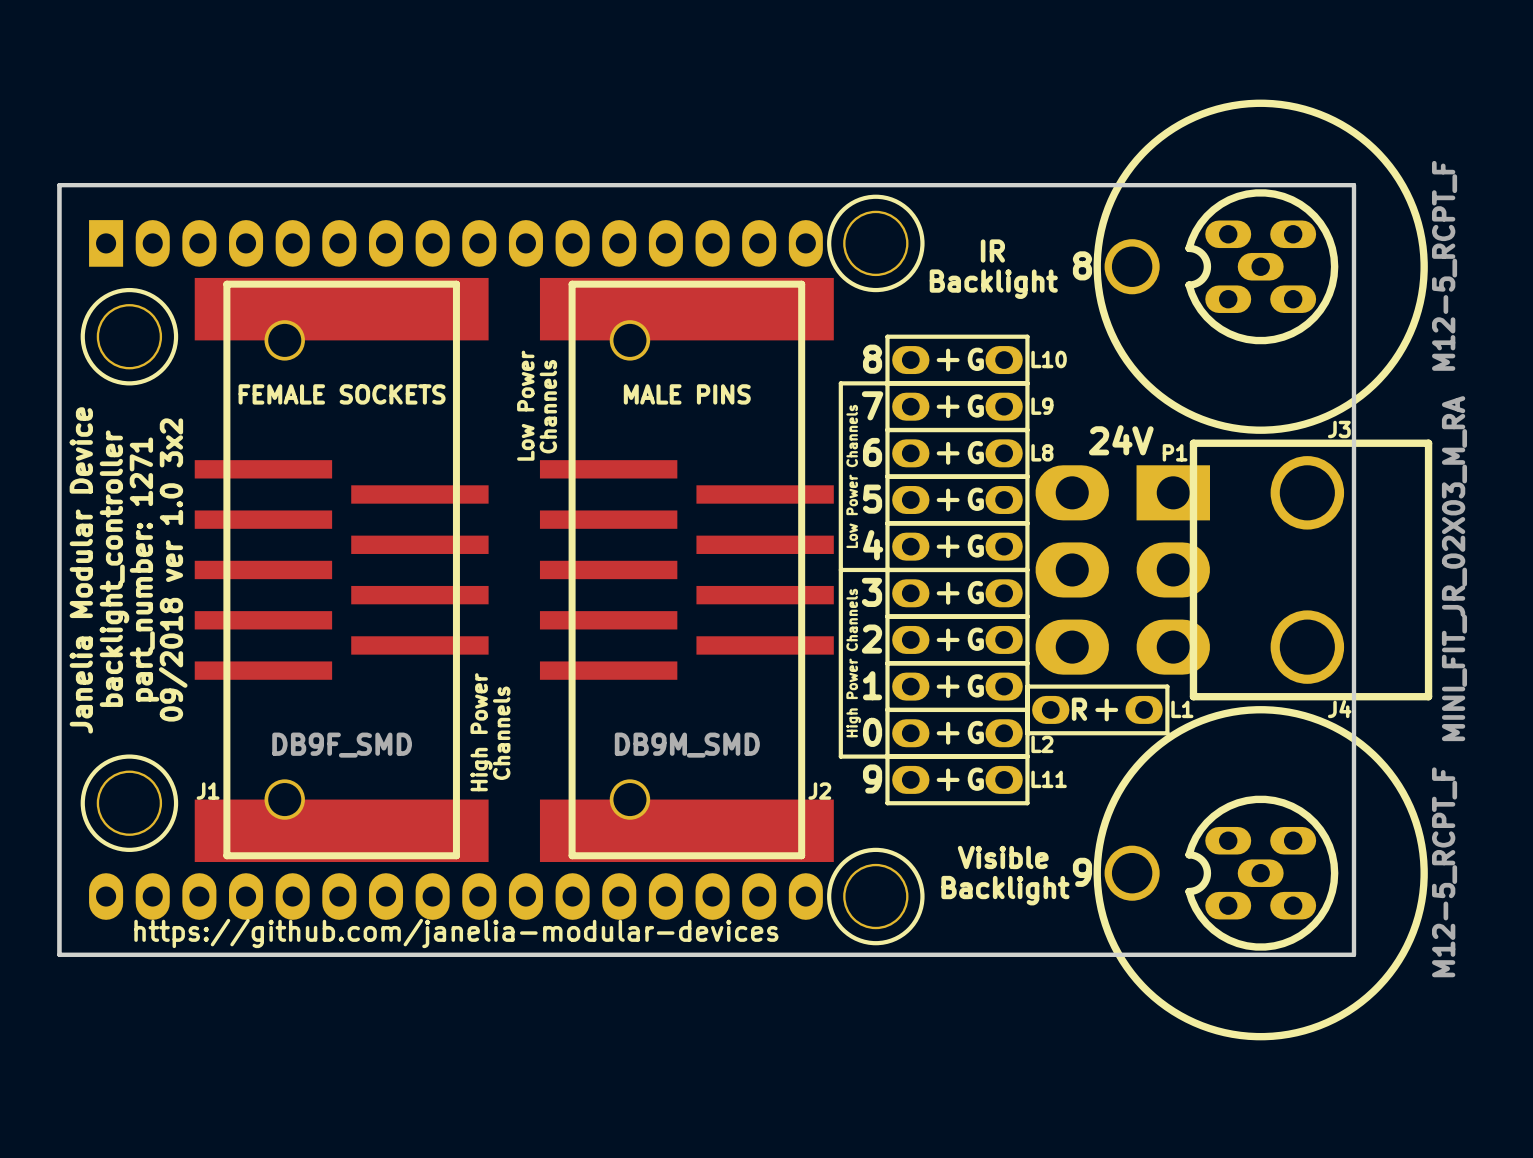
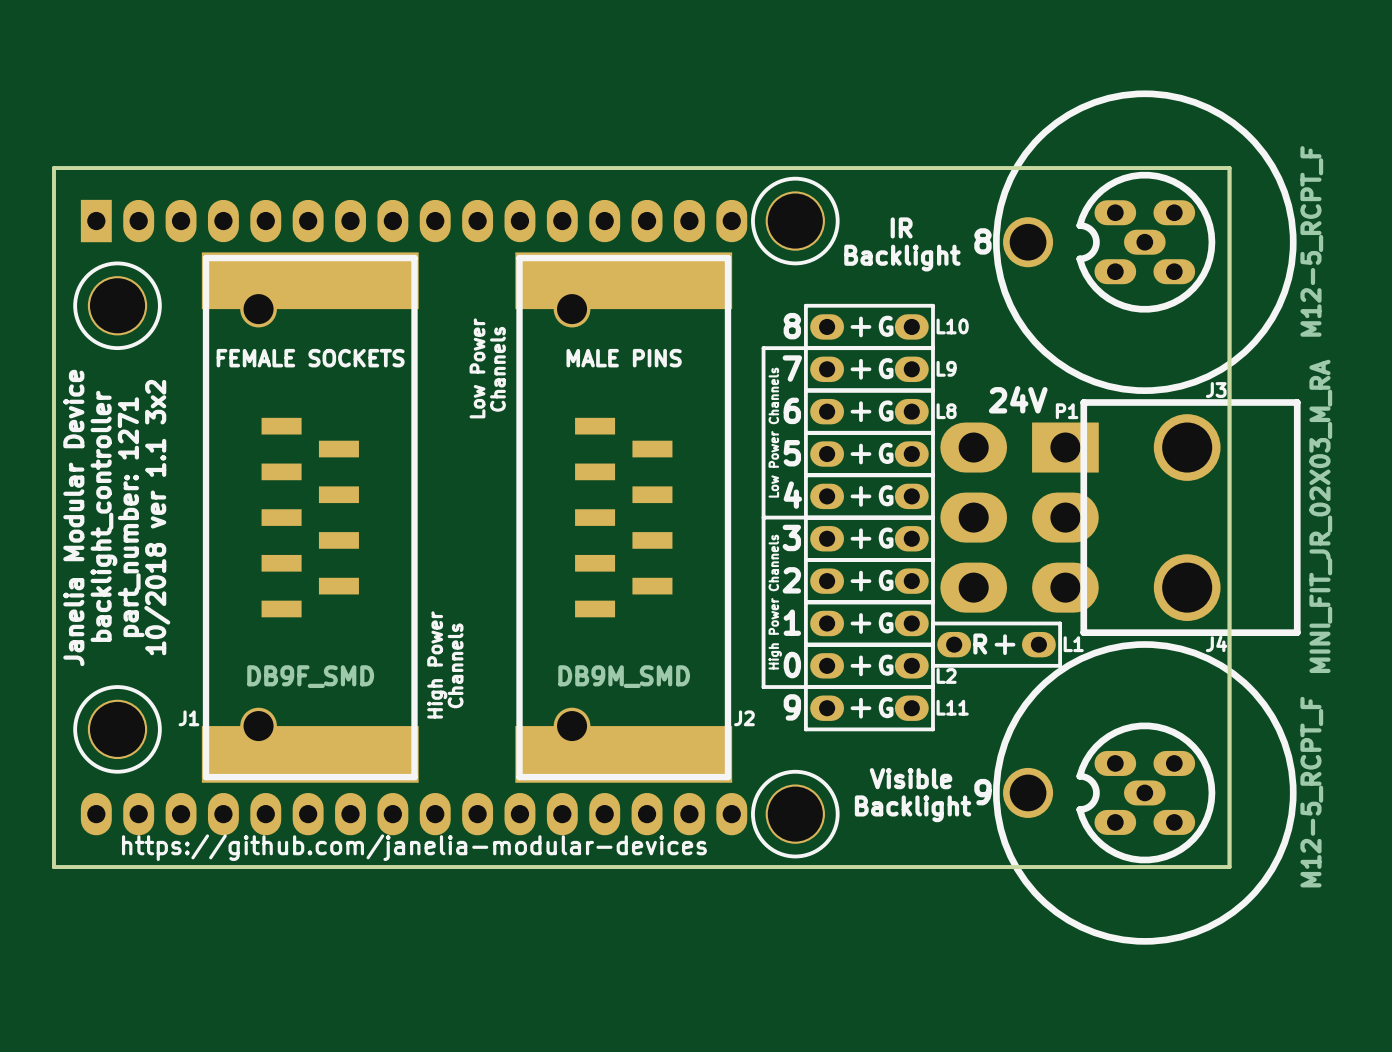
J1 footprint: [194, 277, 489, 863] -> [201, 252, 419, 783]
J2 footprint: [539, 277, 834, 863] -> [515, 252, 733, 783]
text: 09/2018 ver 1.0 3x2 (173, 569) -> 10/2018 ver 1.1 3x2 (157, 517)

